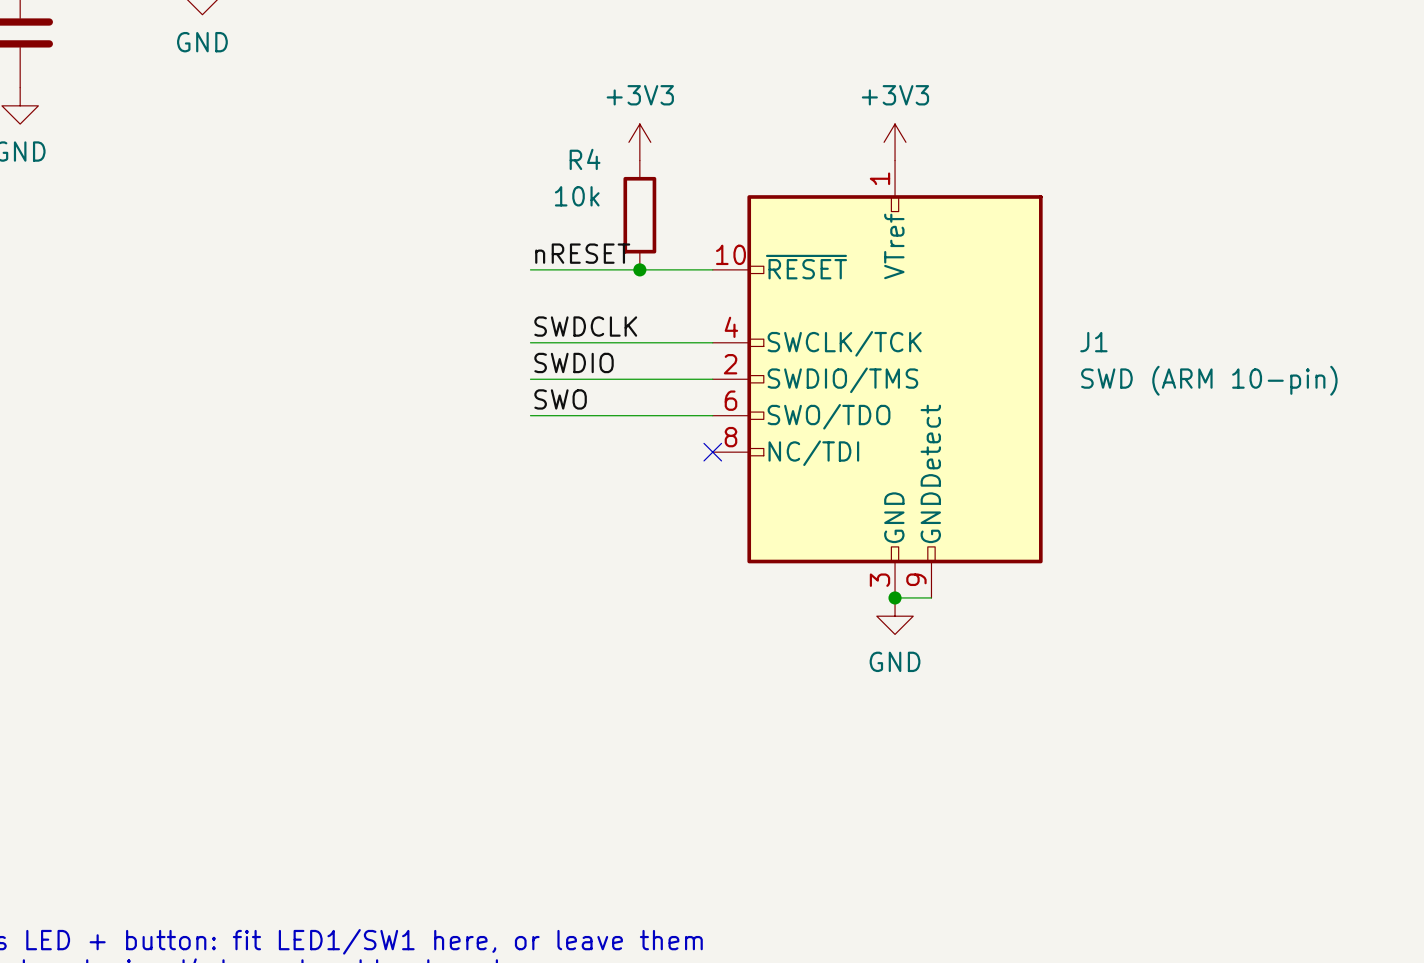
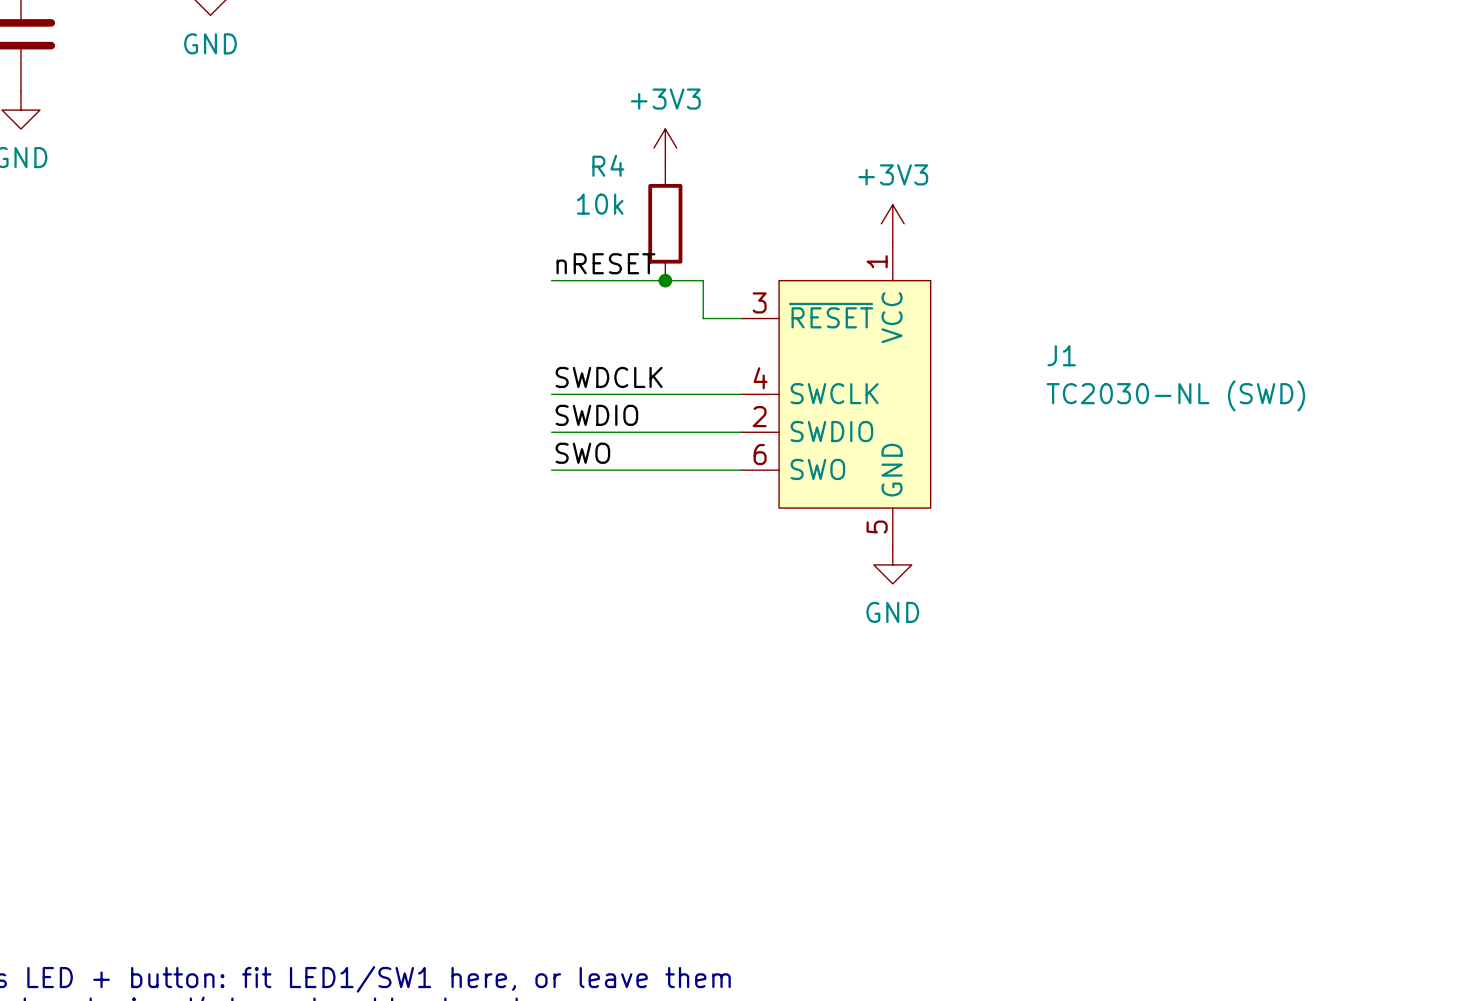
power symbol position: +3V3 (895, 142) -> +3V3 (892, 223)
J1 symbol: [712, 160, 1043, 598] -> [741, 242, 931, 546]
wire: (676, 269) (712, 269) -> (703, 280) (703, 318) (741, 318)
label: SWDCLK (585, 326) -> none
wire: (530, 342) (712, 342) -> (551, 470) (741, 470)
label: SWDIO (574, 362) -> SWDCLK (609, 377)
J1 value: SWD (ARM 10-pin) (1209, 380) -> TC2030-NL (SWD) (1175, 395)
label: SWO (560, 399) -> SWDIO (596, 415)
label: none -> SWO (582, 453)
no-connect mark: (712, 452) -> none
wire: (895, 597) (931, 597) -> none
junction: (895, 597) -> none
power symbol position: GND (895, 616) -> GND (892, 564)

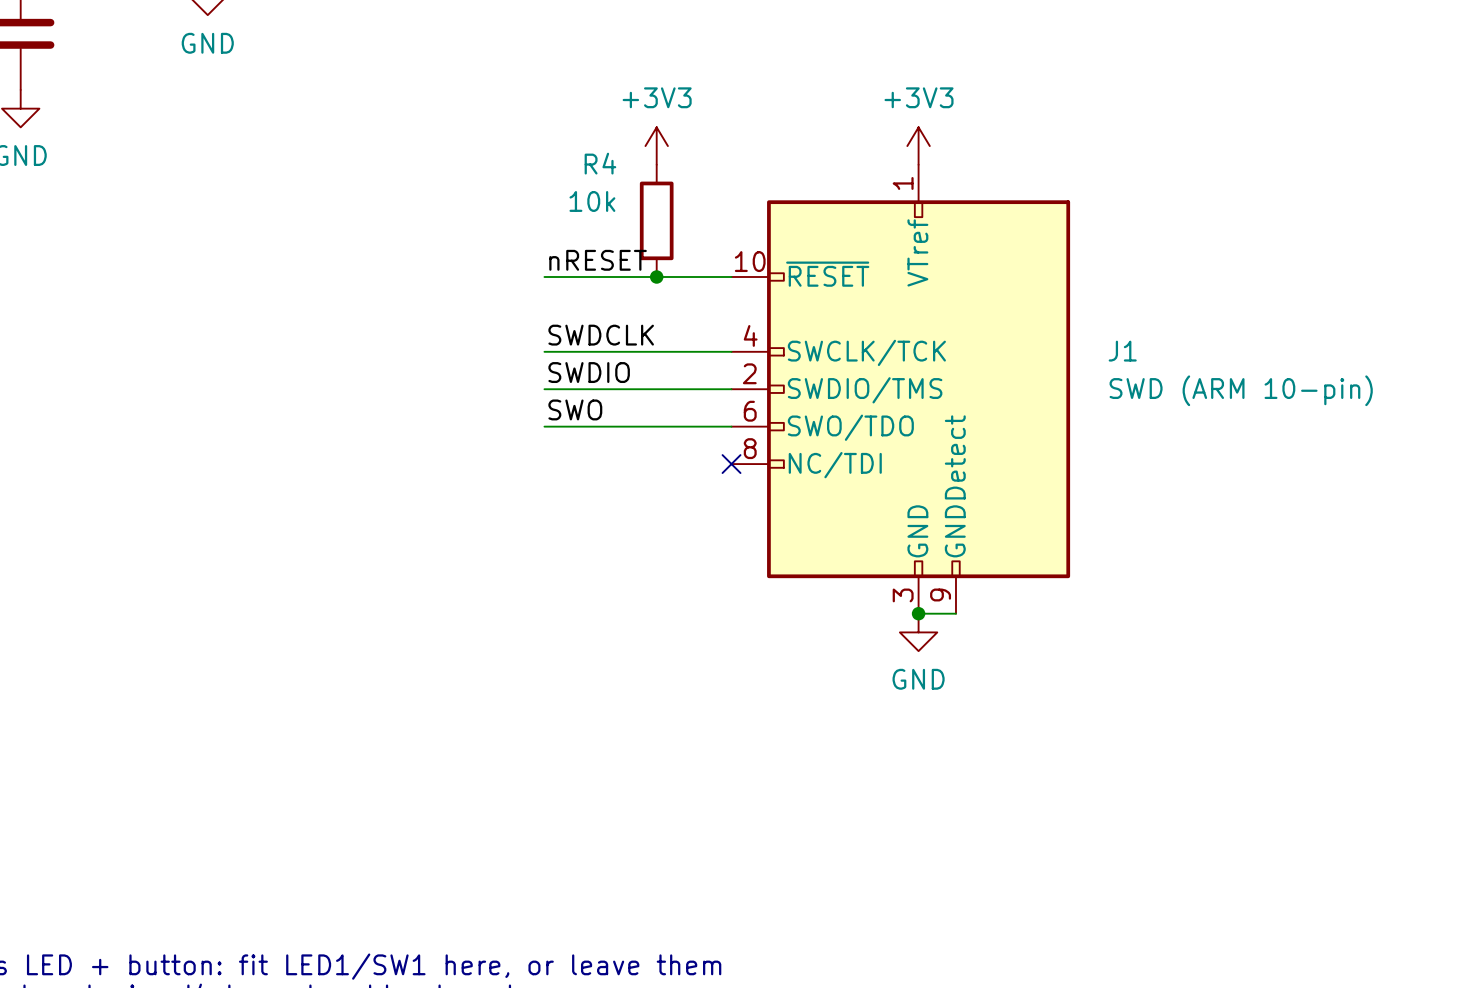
power symbol position: +3V3 (892, 223) -> +3V3 (918, 146)
J1 symbol: [741, 242, 931, 546] -> [731, 164, 1071, 614]
wire: (703, 280) (703, 318) (741, 318) -> (694, 276) (731, 276)
label: none -> SWDCLK (601, 335)
label: SWDCLK (609, 377) -> SWDIO (589, 372)
J1 value: TC2030-NL (SWD) (1175, 395) -> SWD (ARM 10-pin) (1241, 390)
label: SWDIO (596, 415) -> SWO (575, 409)
label: SWO (582, 453) -> none
wire: (551, 470) (741, 470) -> (544, 351) (731, 351)
no-connect mark: none -> (731, 464)
power symbol position: GND (892, 564) -> GND (918, 632)
wire: none -> (918, 613) (955, 613)
junction: none -> (918, 613)

